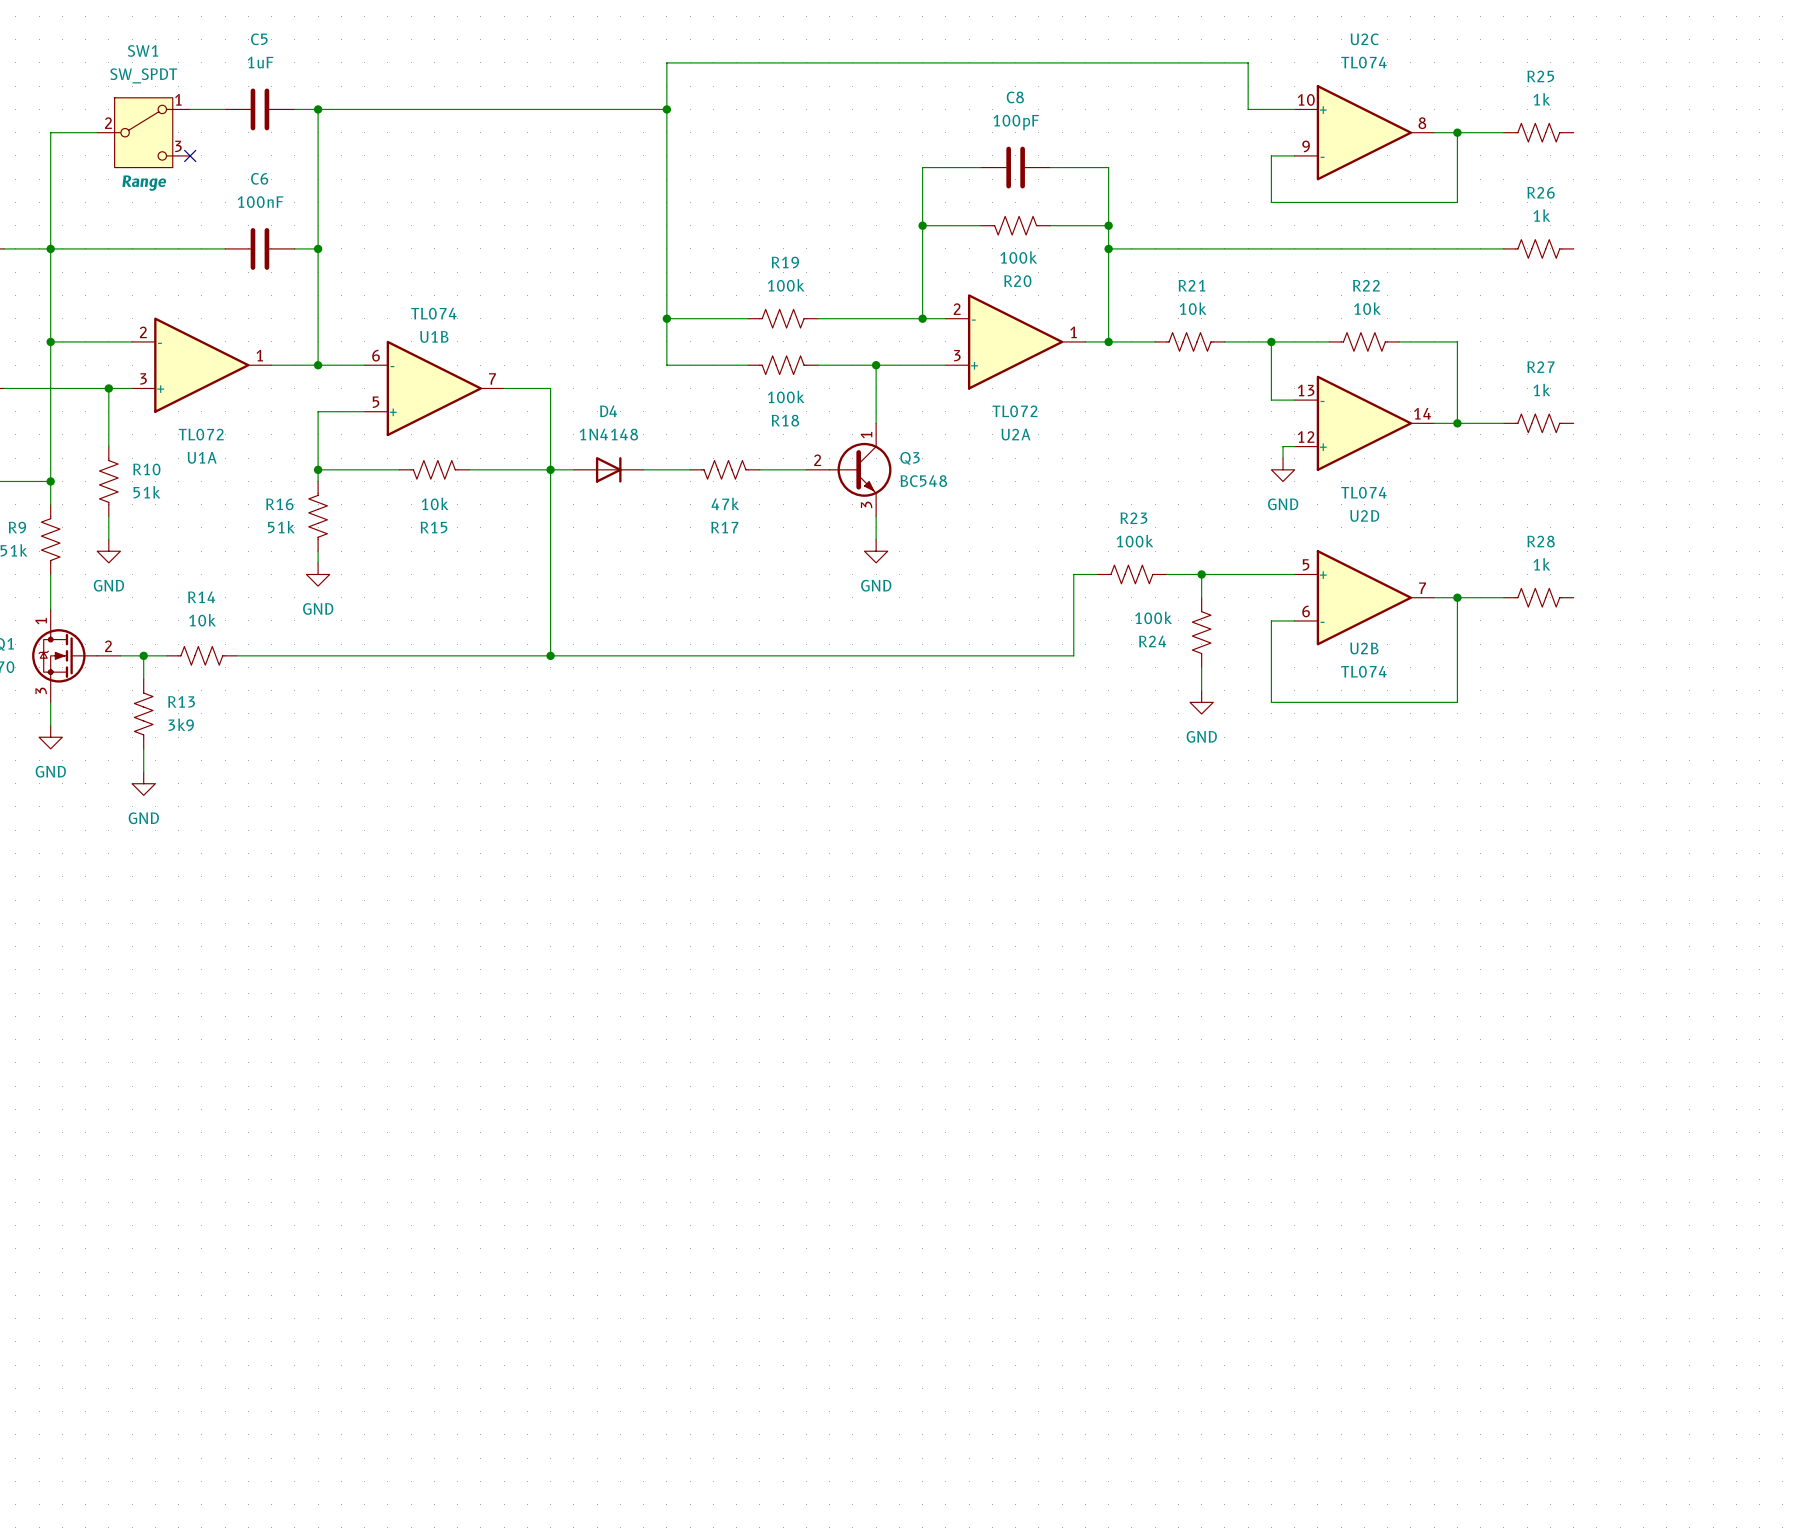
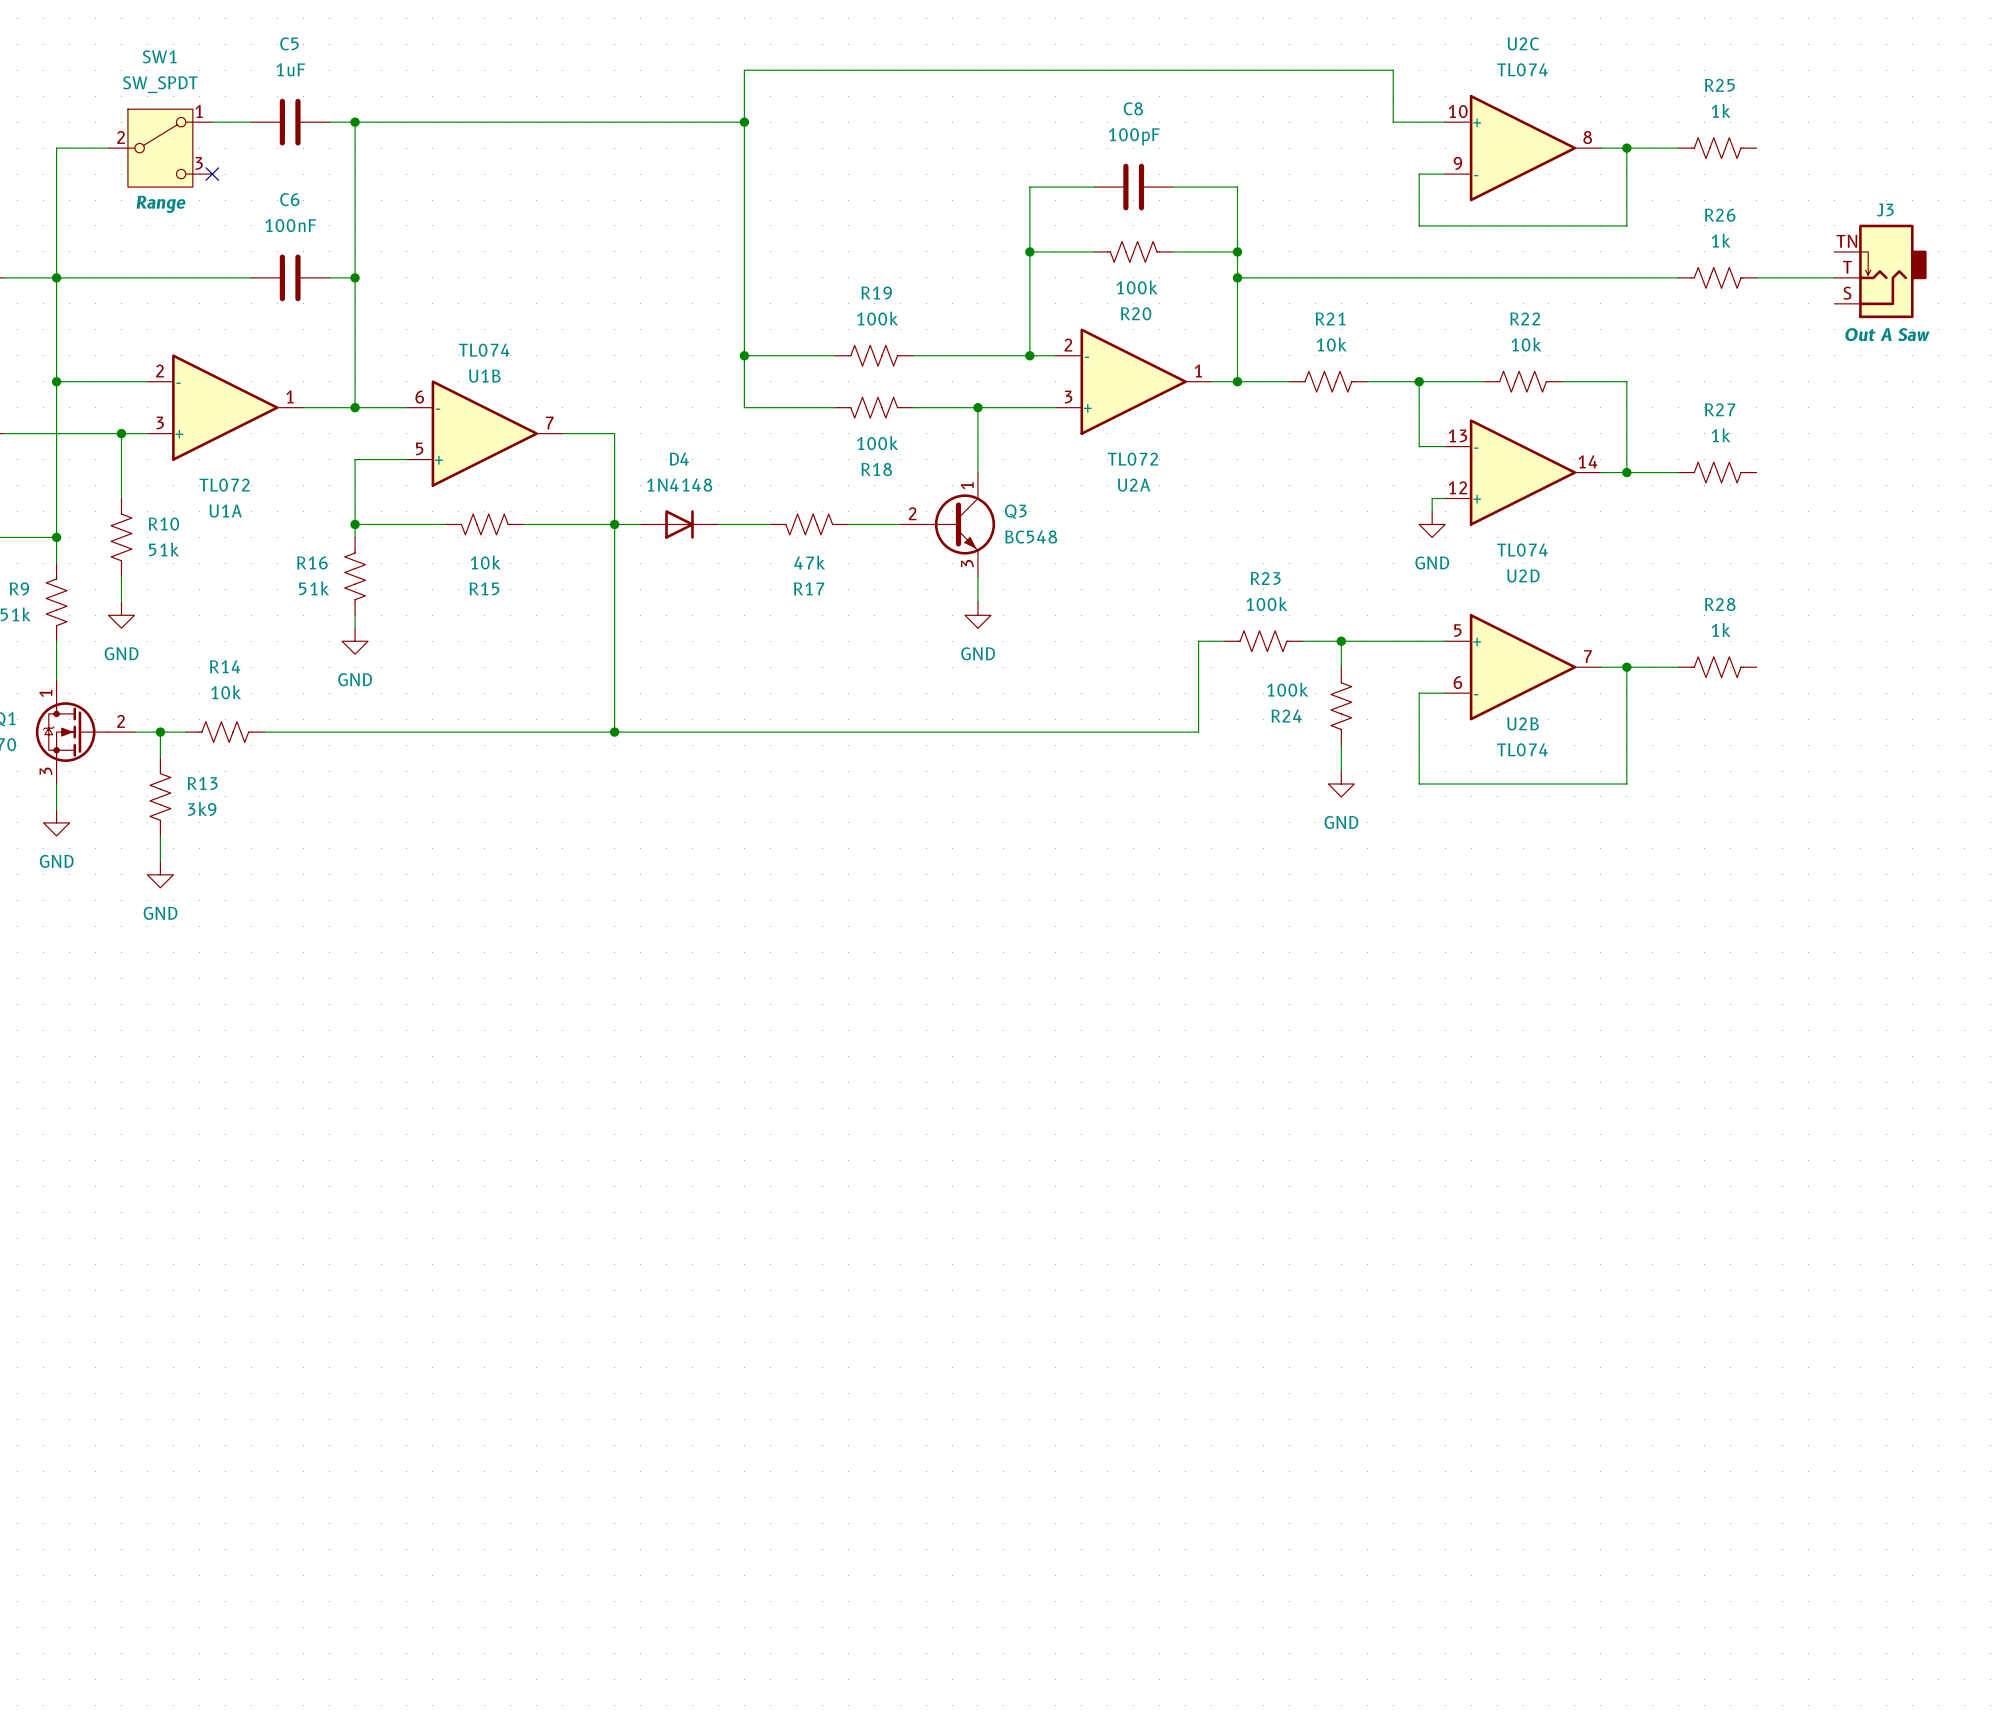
J3: none -> (1880, 271)
wire: none -> (1756, 277) (1834, 277)

